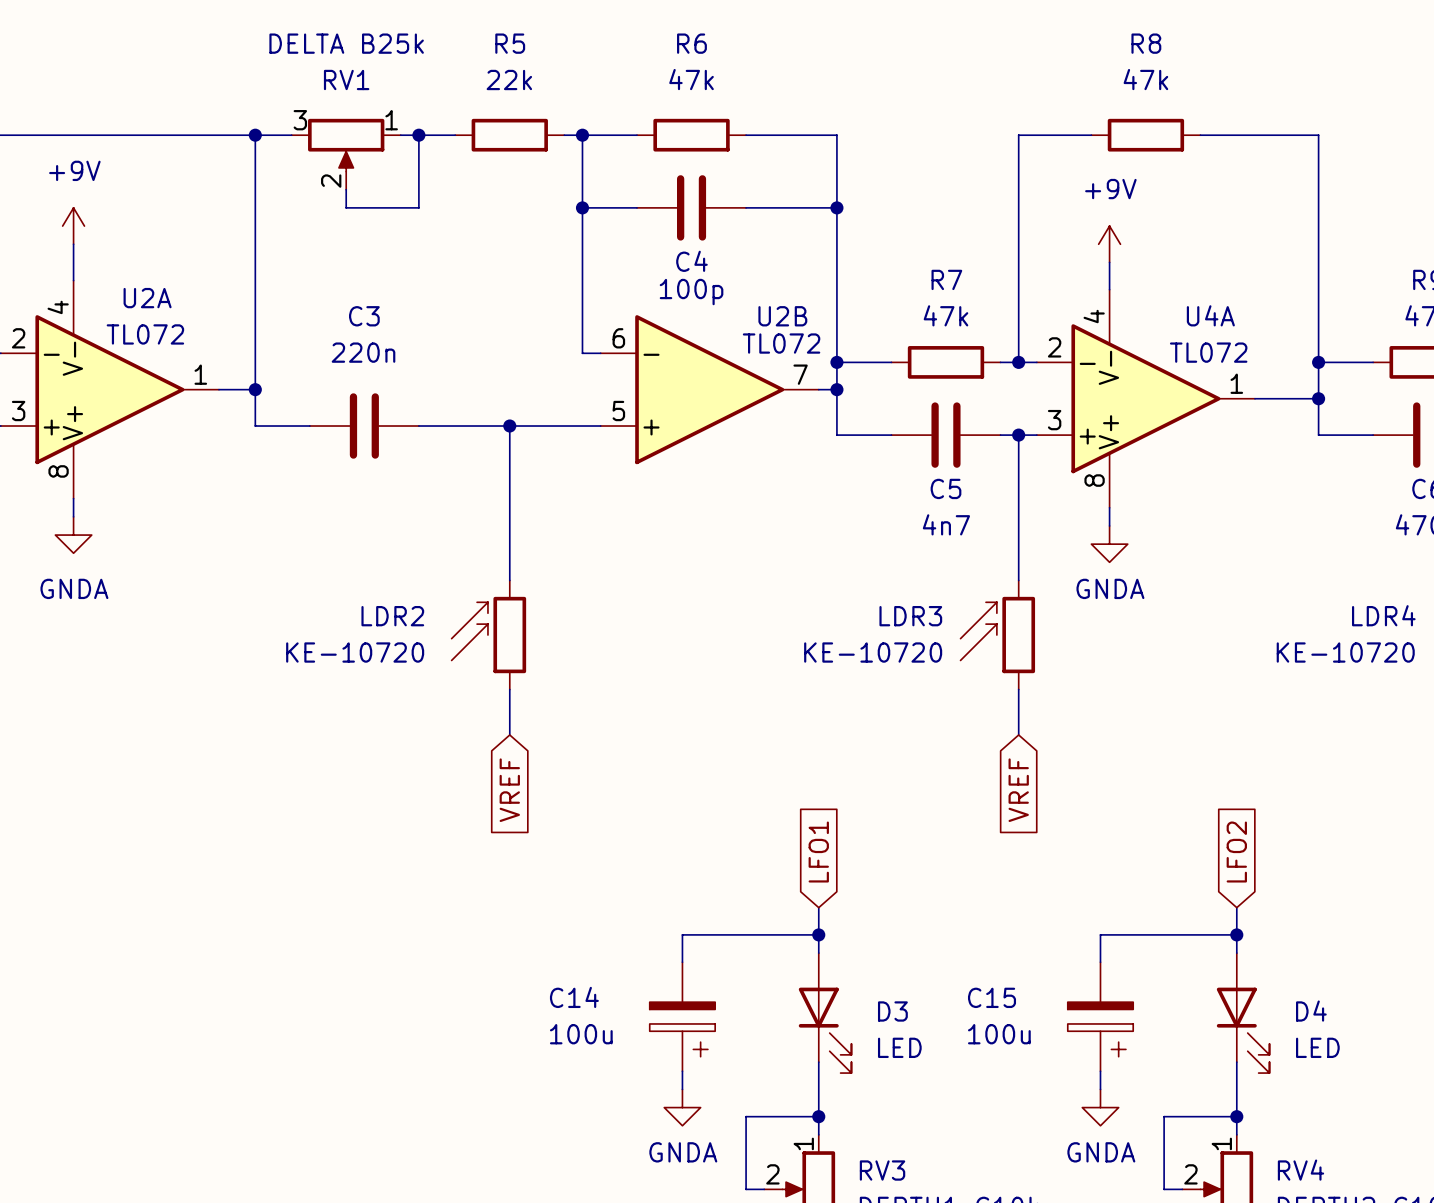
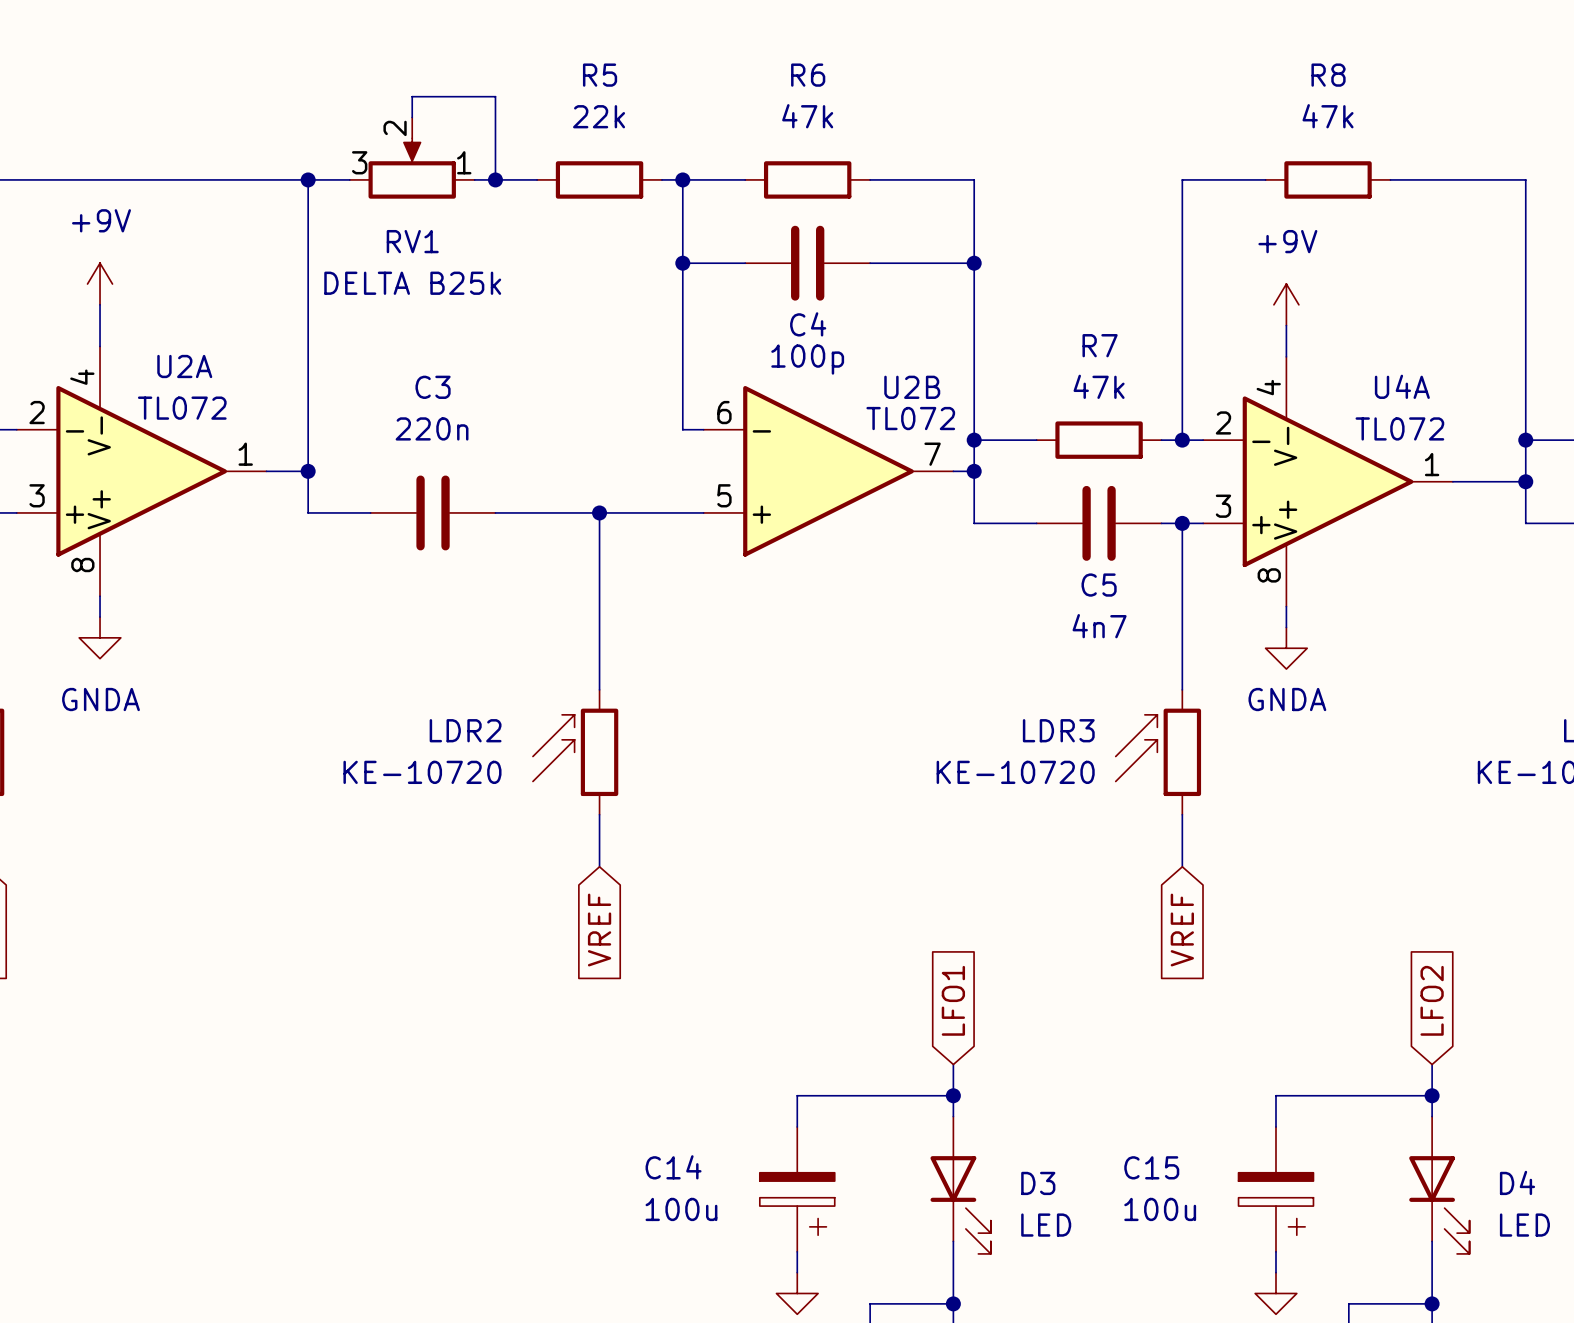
wire: (418, 135) (418, 207) (346, 207) (346, 189) -> (495, 179) (495, 96) (412, 96) (412, 117)
RV1 flip: as is (346, 145) -> up-down (412, 168)

